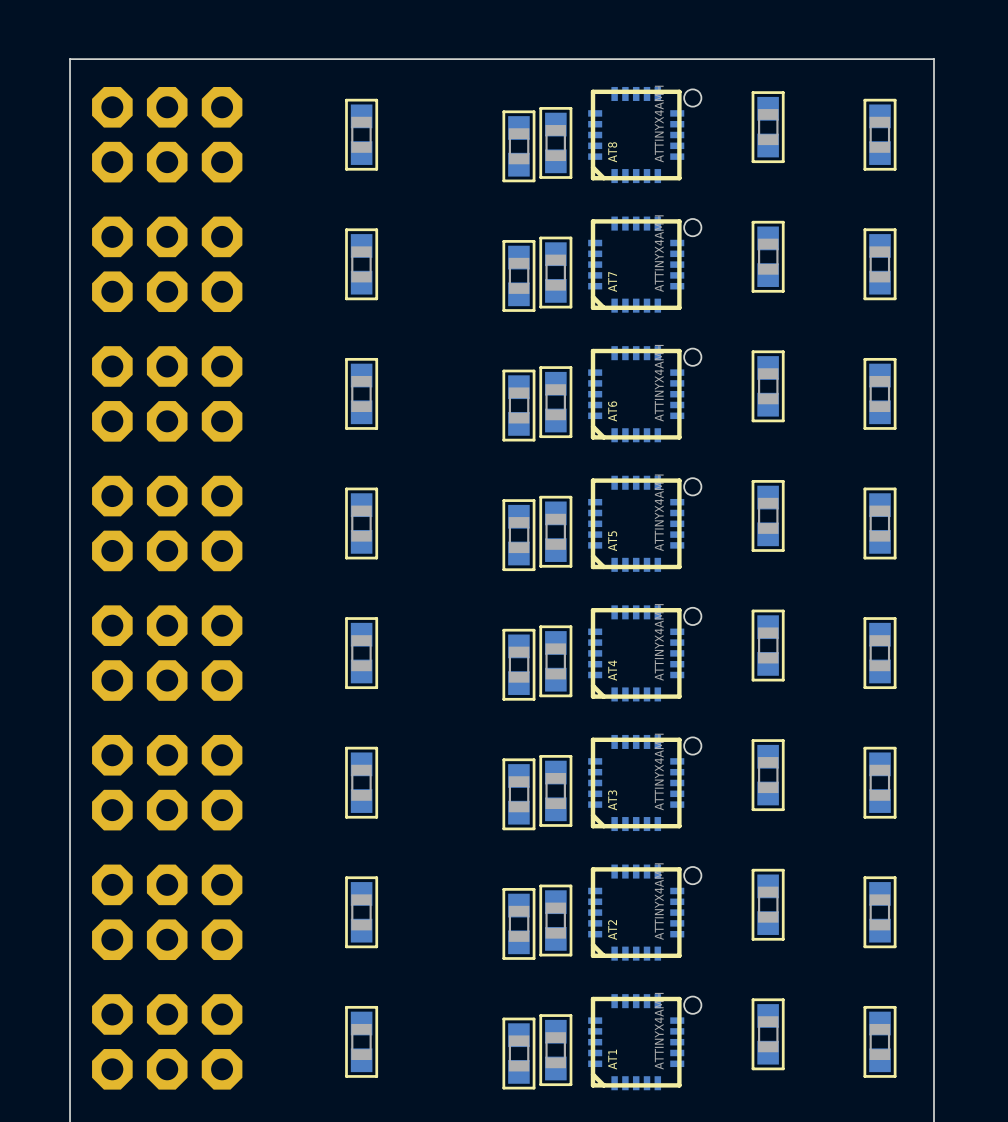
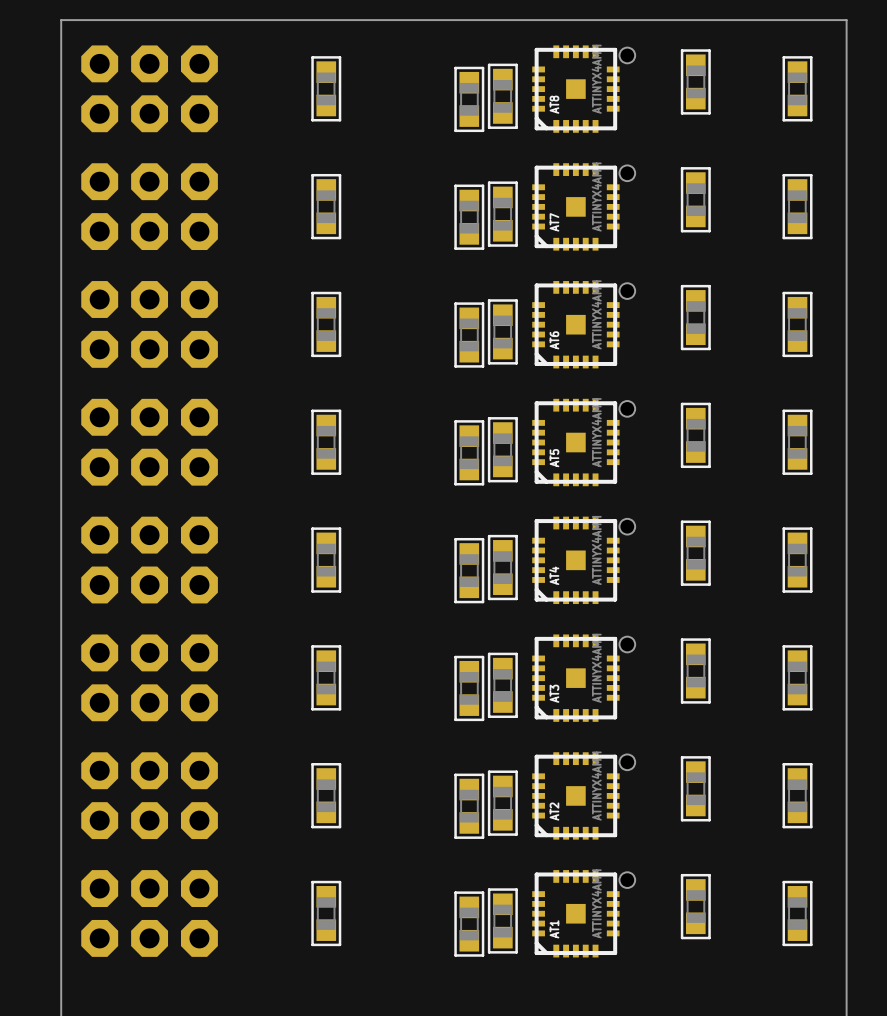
AT8 footprint: [588, 86, 685, 184] -> [532, 45, 620, 133]
AT7 footprint: [588, 216, 685, 313] -> [532, 163, 620, 251]
AT6 footprint: [588, 346, 685, 443] -> [532, 281, 620, 369]
AT5 footprint: [588, 475, 685, 572] -> [532, 398, 620, 487]
AT4 footprint: [588, 605, 685, 702] -> [532, 516, 620, 605]
AT3 footprint: [588, 734, 685, 832] -> [532, 634, 620, 722]
AT2 footprint: [588, 864, 685, 961] -> [532, 752, 620, 840]
AT1 footprint: [588, 994, 685, 1091] -> [532, 870, 620, 958]

